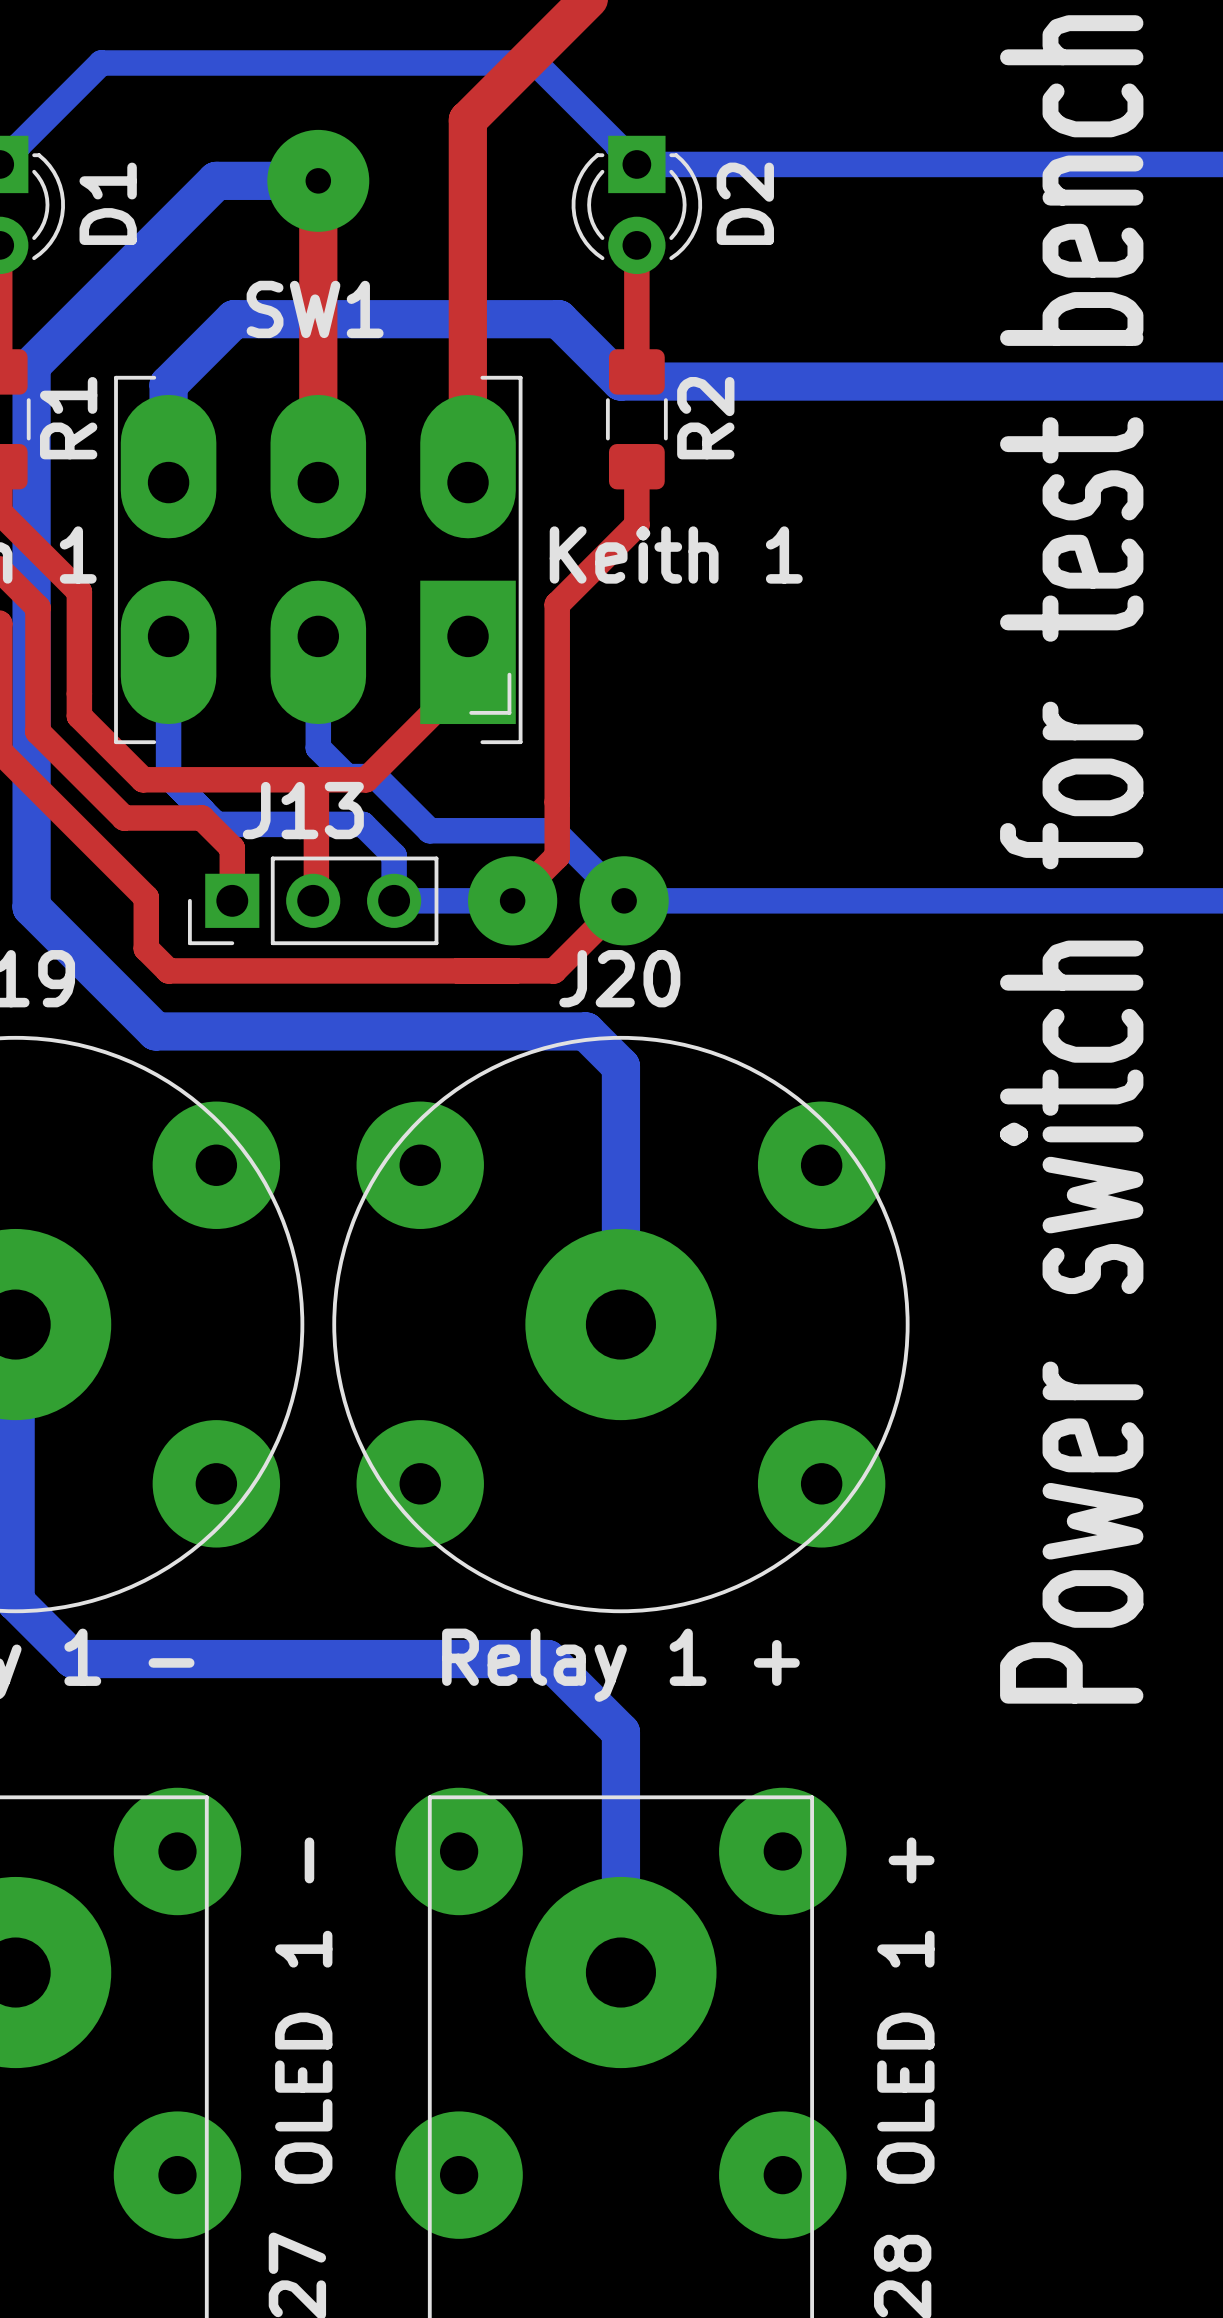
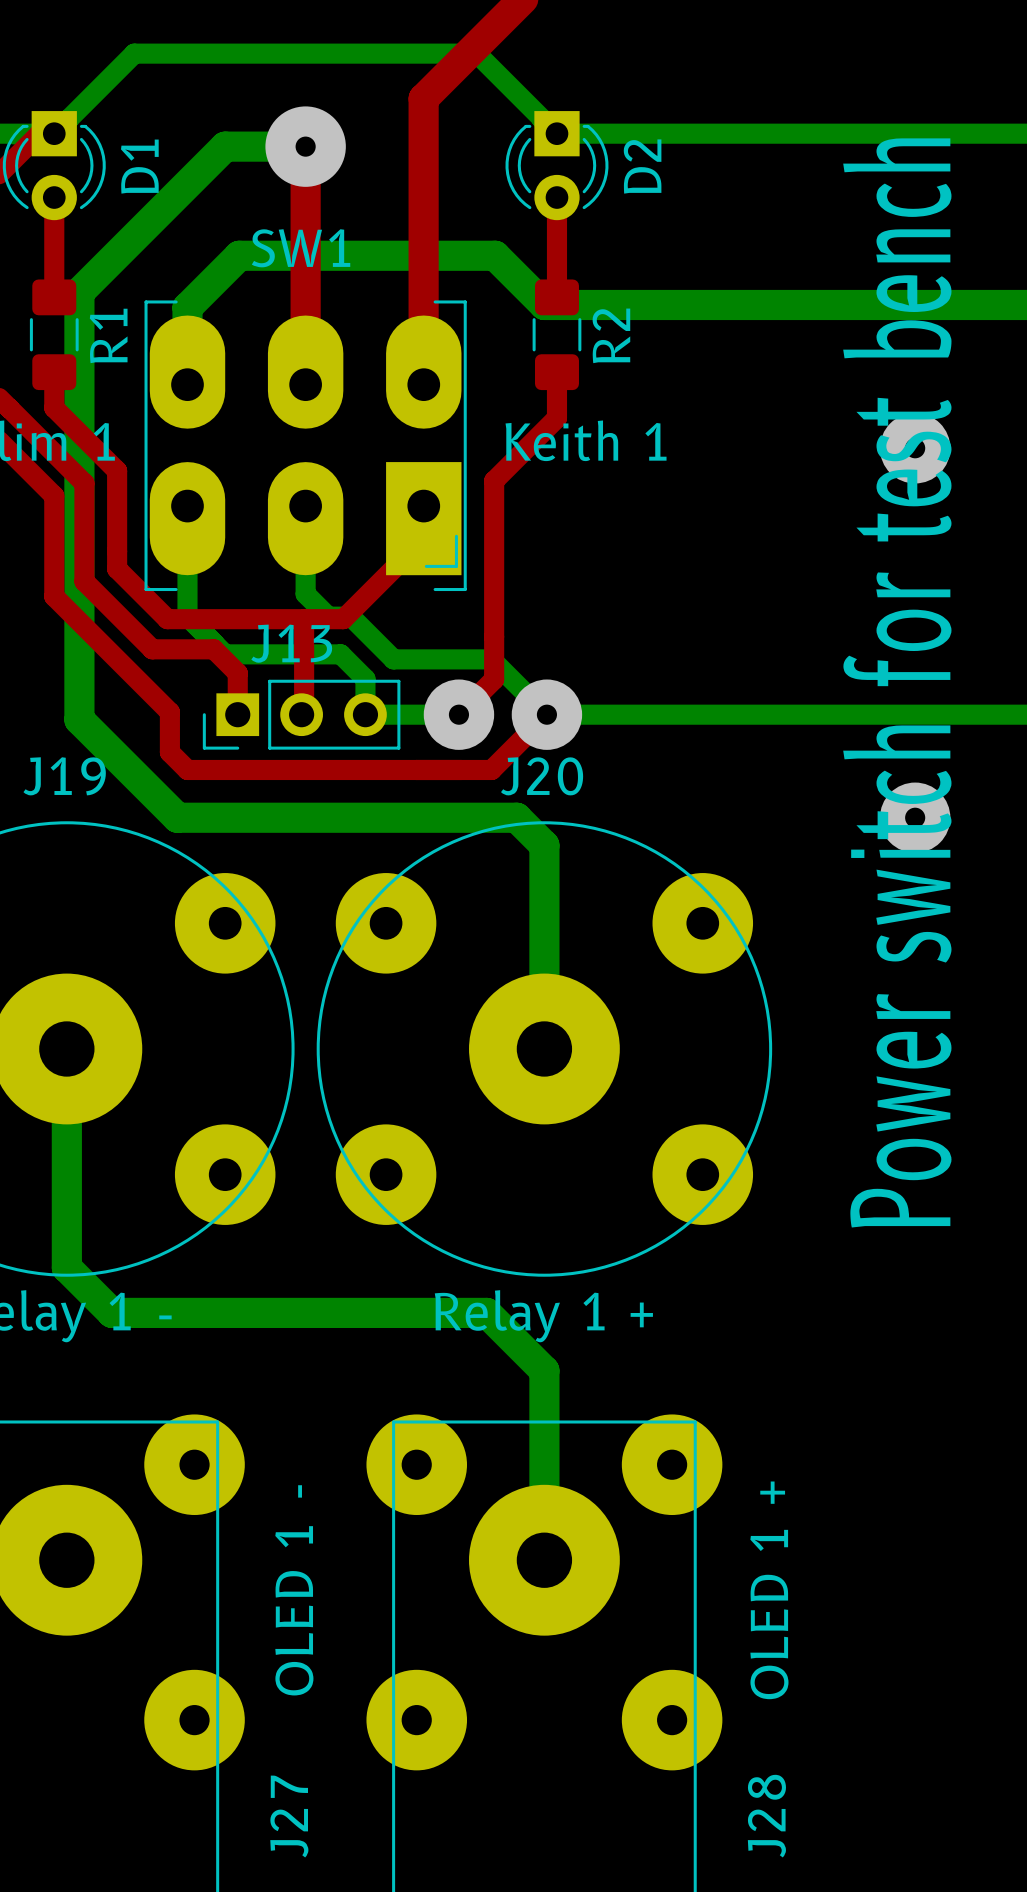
via: none -> (915, 448)
via: none -> (915, 817)

